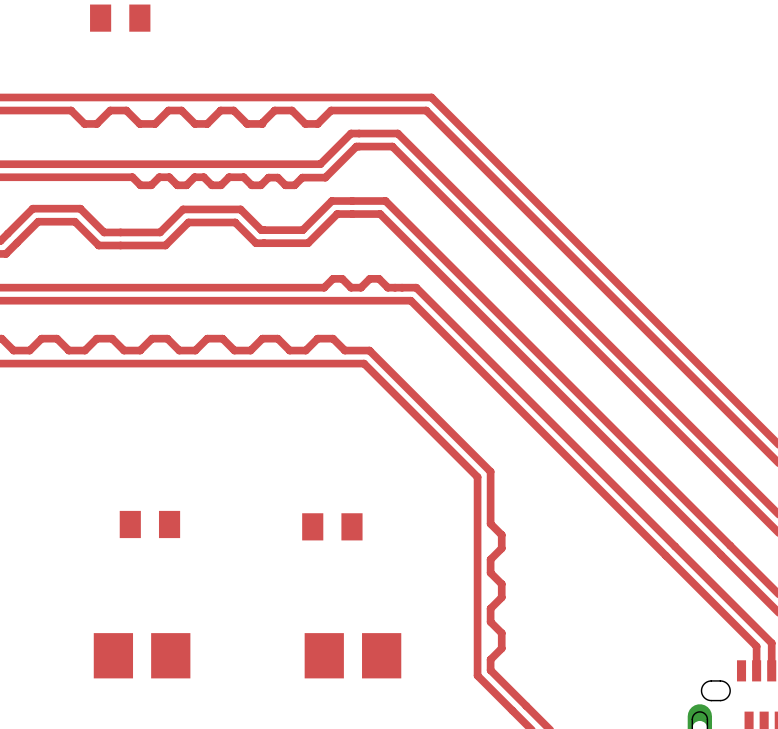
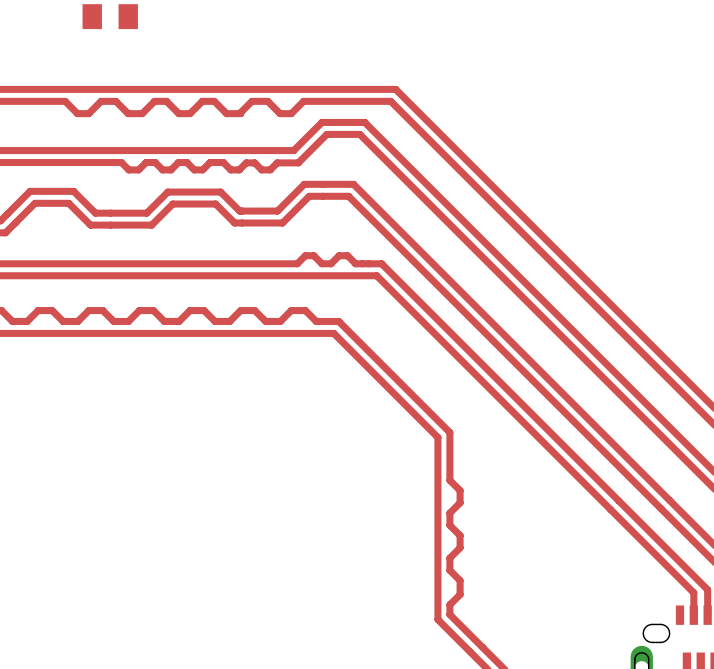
part: (149, 524) -> none
part: (332, 526) -> none
part: (142, 655) -> none
part: (352, 655) -> none

